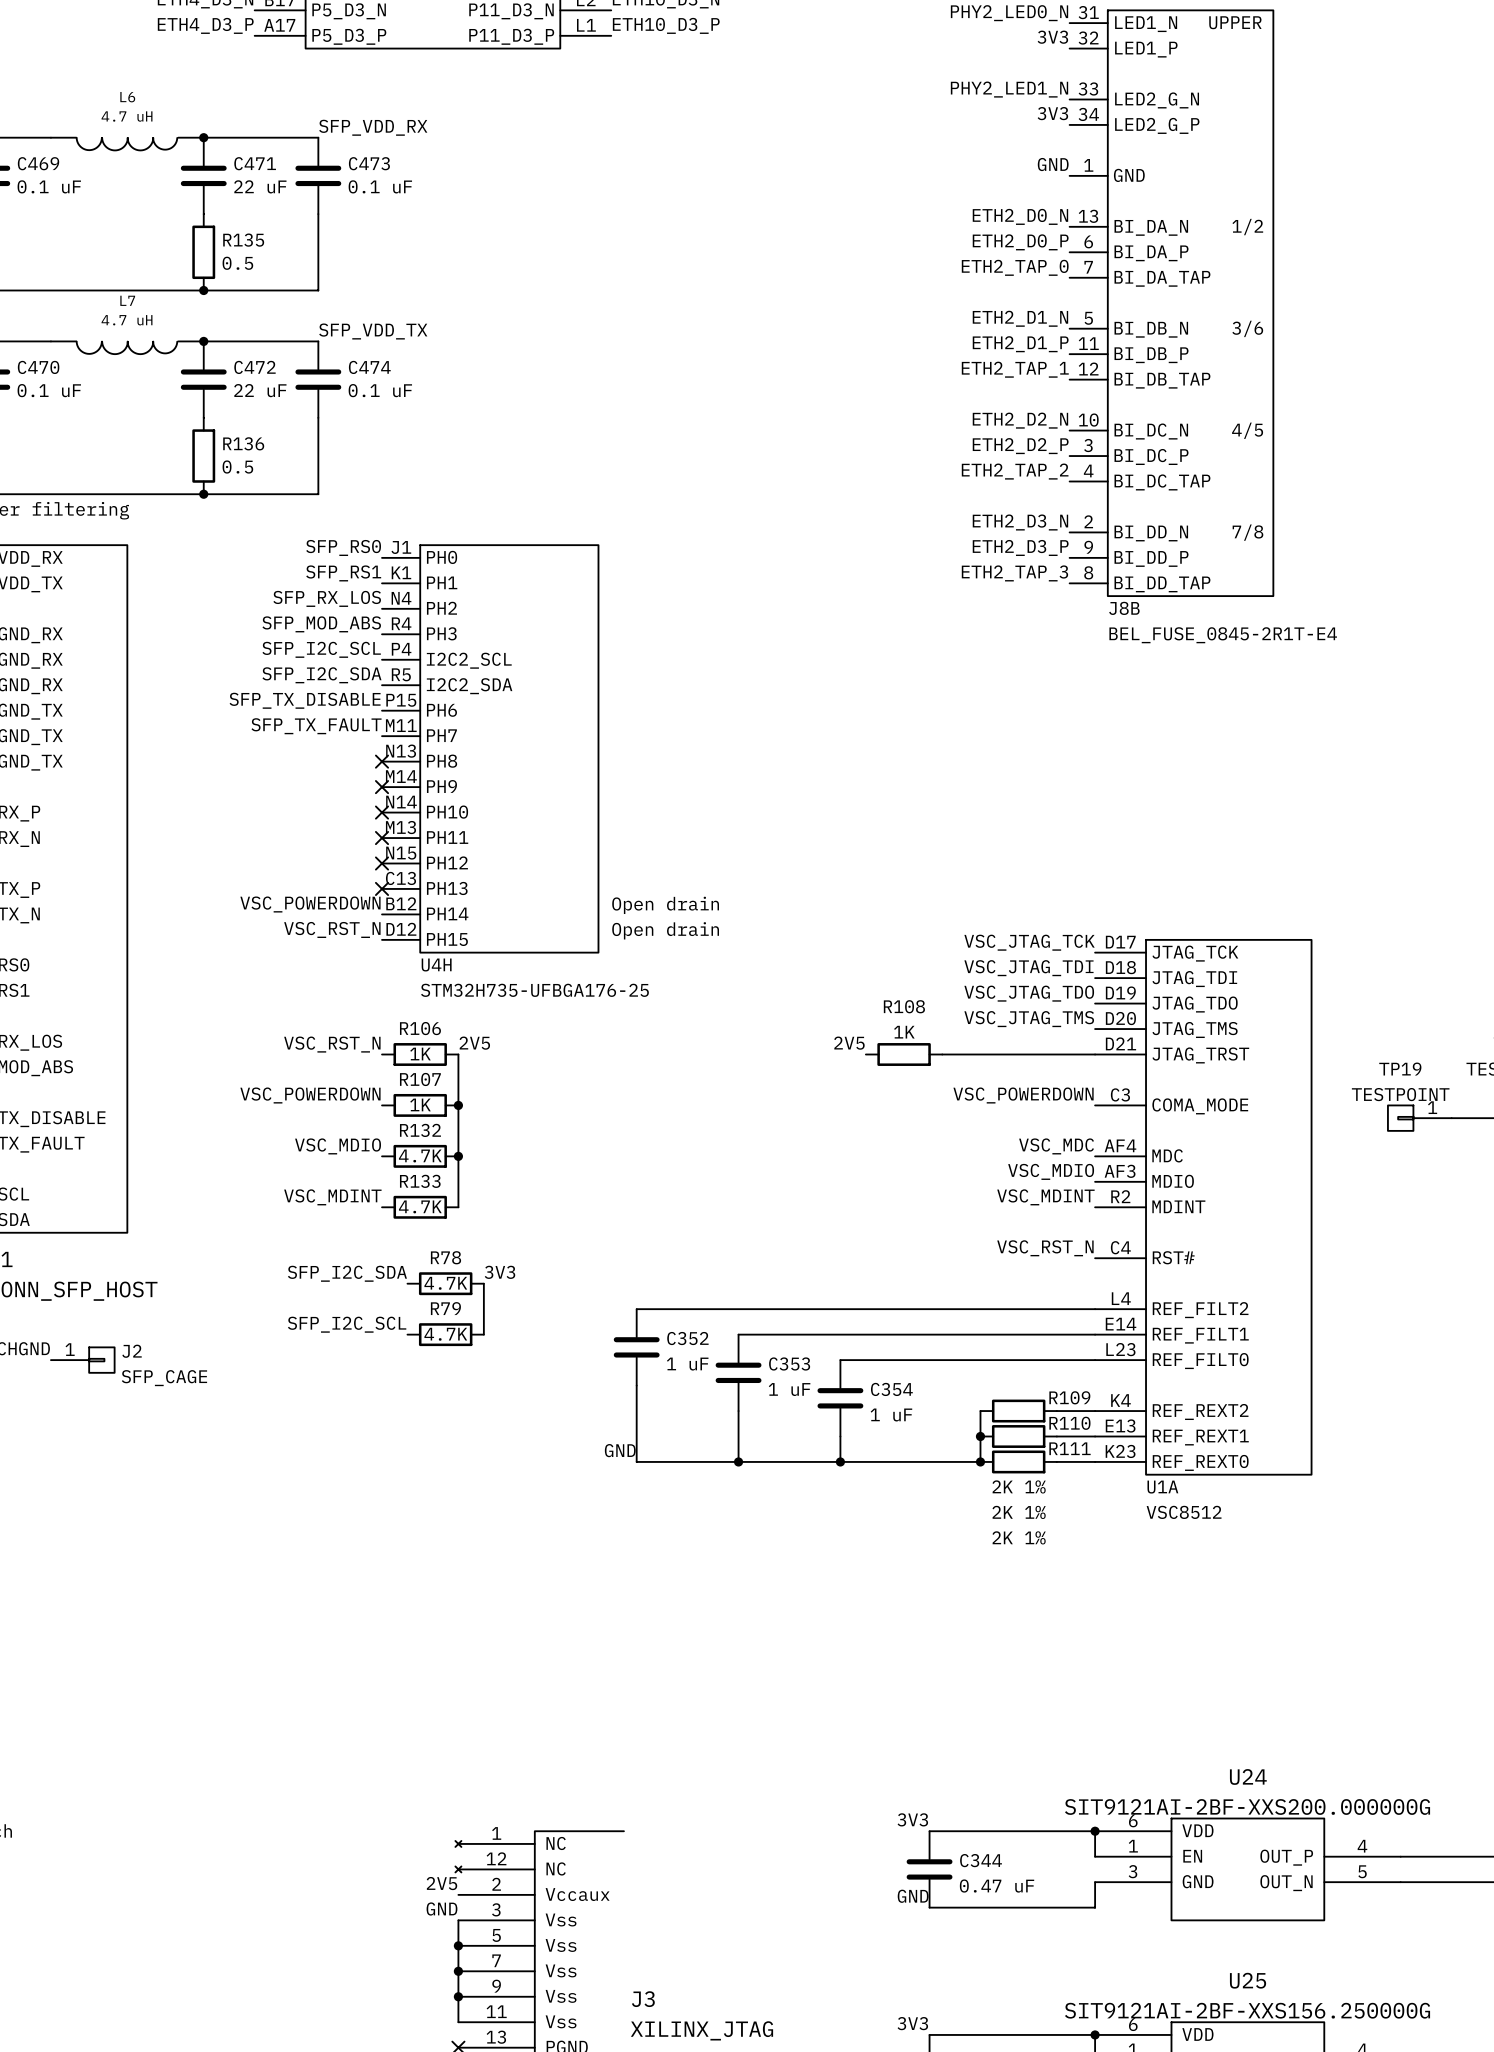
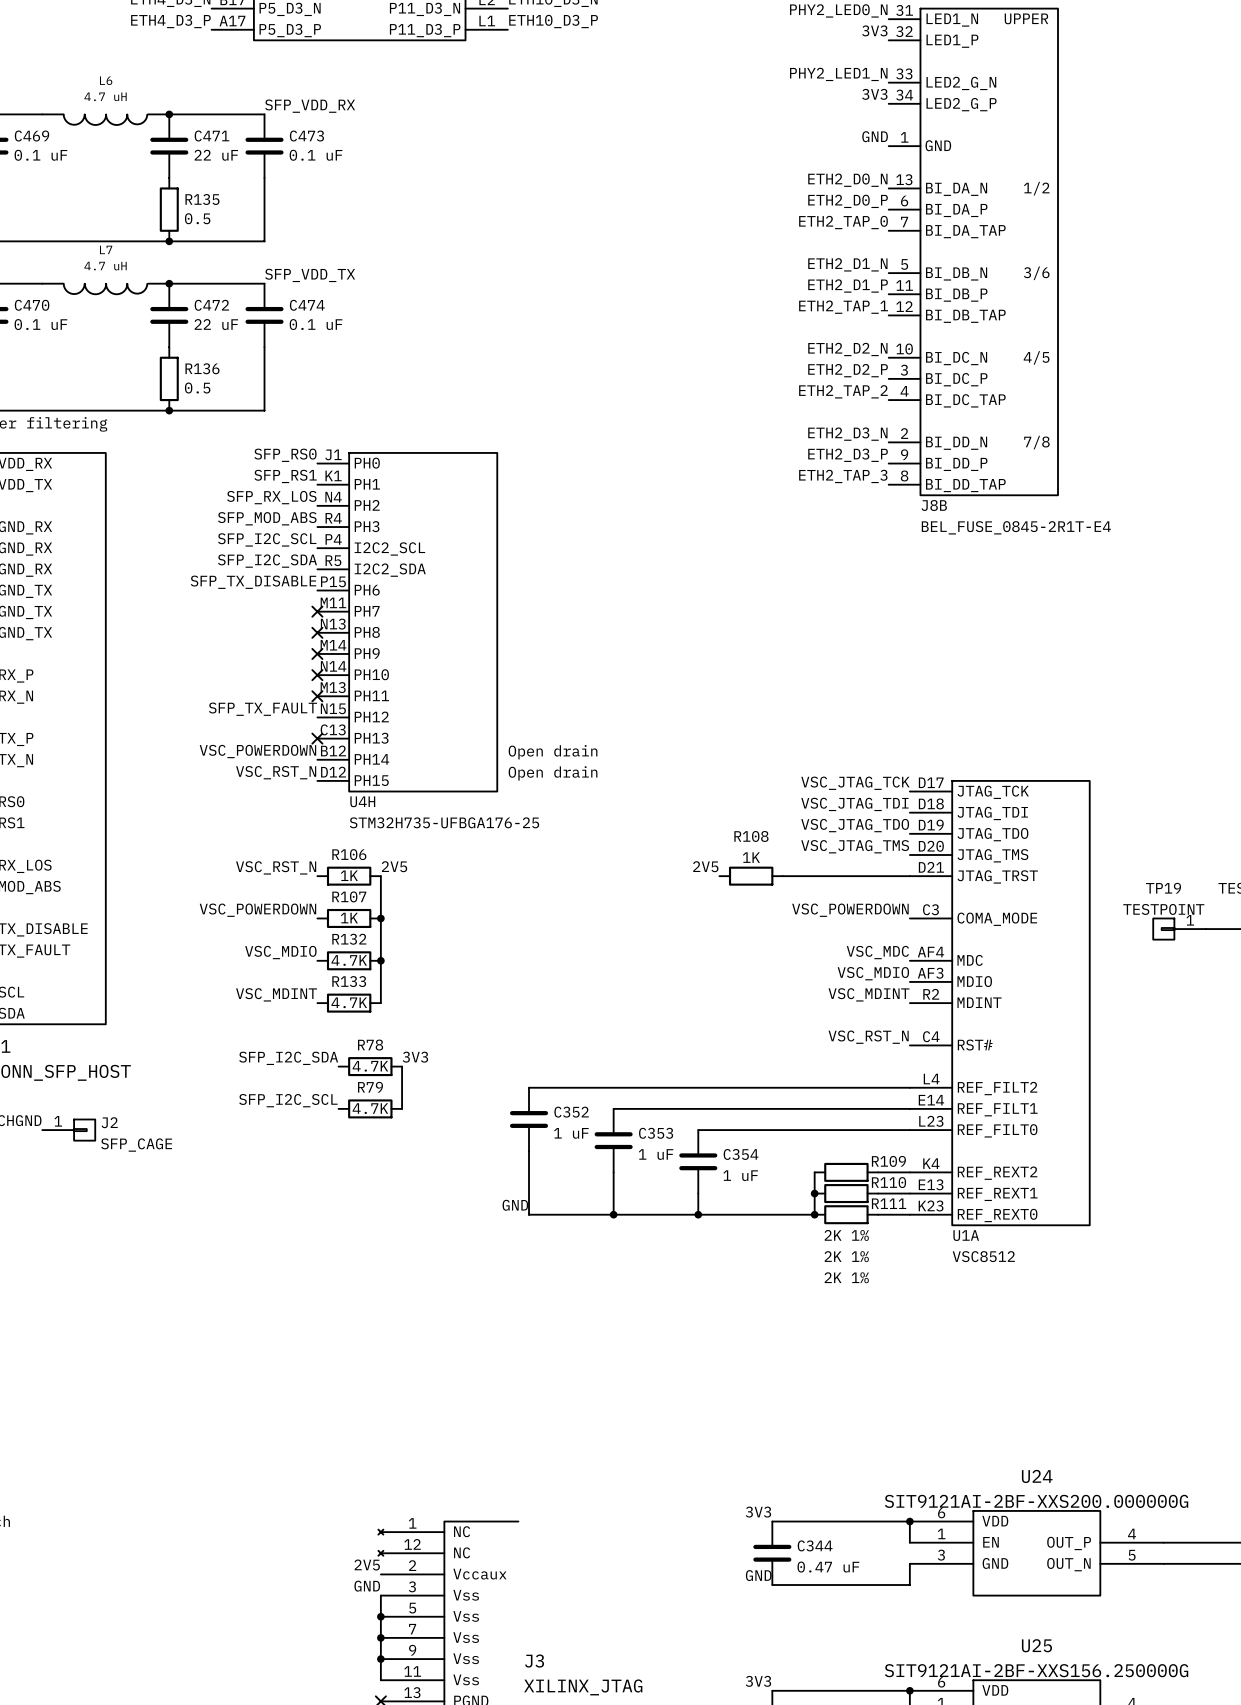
label position: SFP_TX_FAULT (316, 726) -> SFP_TX_FAULT (262, 709)
no-connect mark: none -> (317, 611)
no-connect mark: (382, 863) -> none

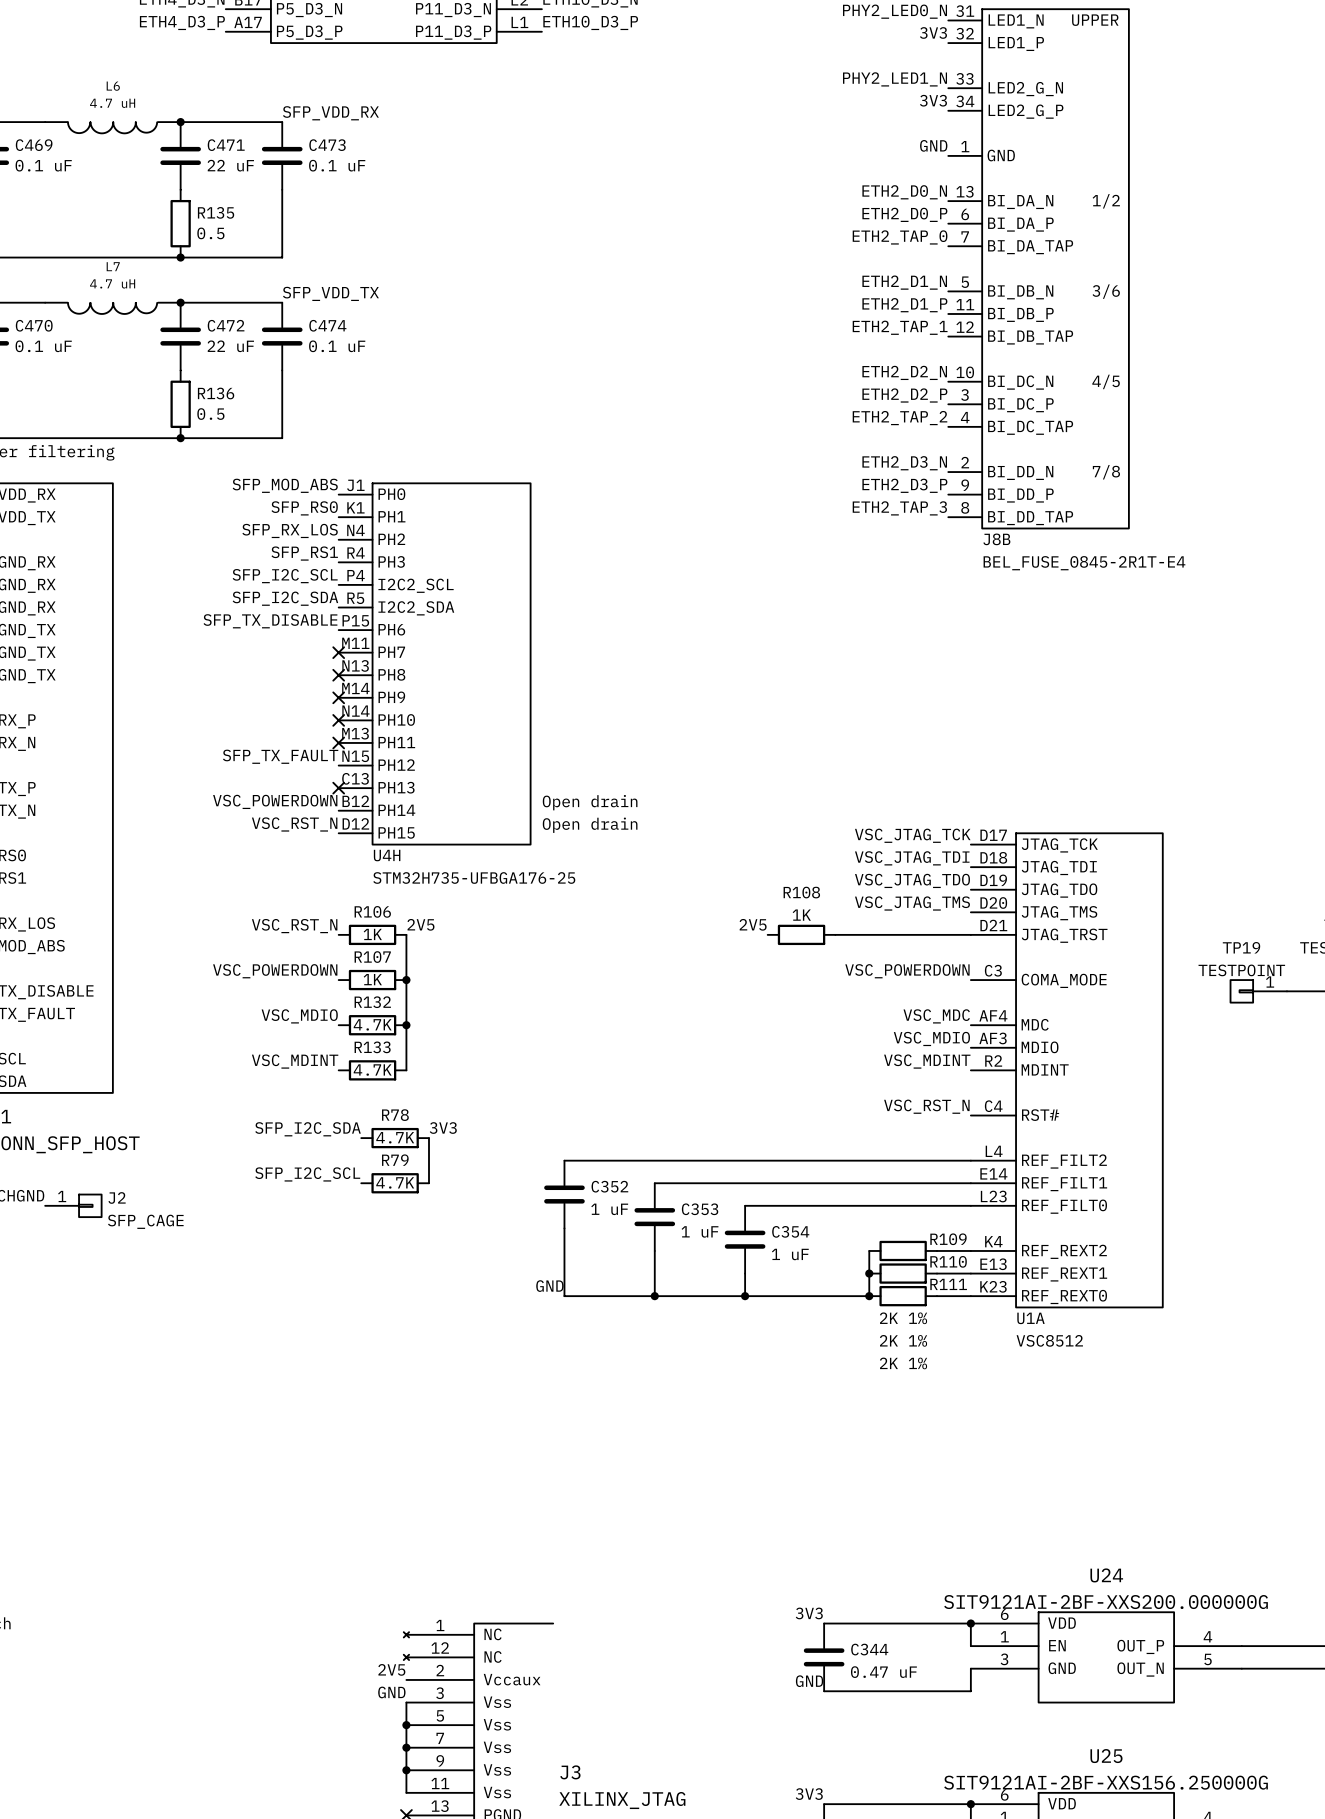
label: SFP_RS0 (285, 455) -> SFP_MOD_ABS (285, 485)
label: SFP_RS1 (285, 476) -> SFP_RS0 (304, 508)
label: SFP_MOD_ABS (267, 518) -> SFP_RS1 (304, 553)

